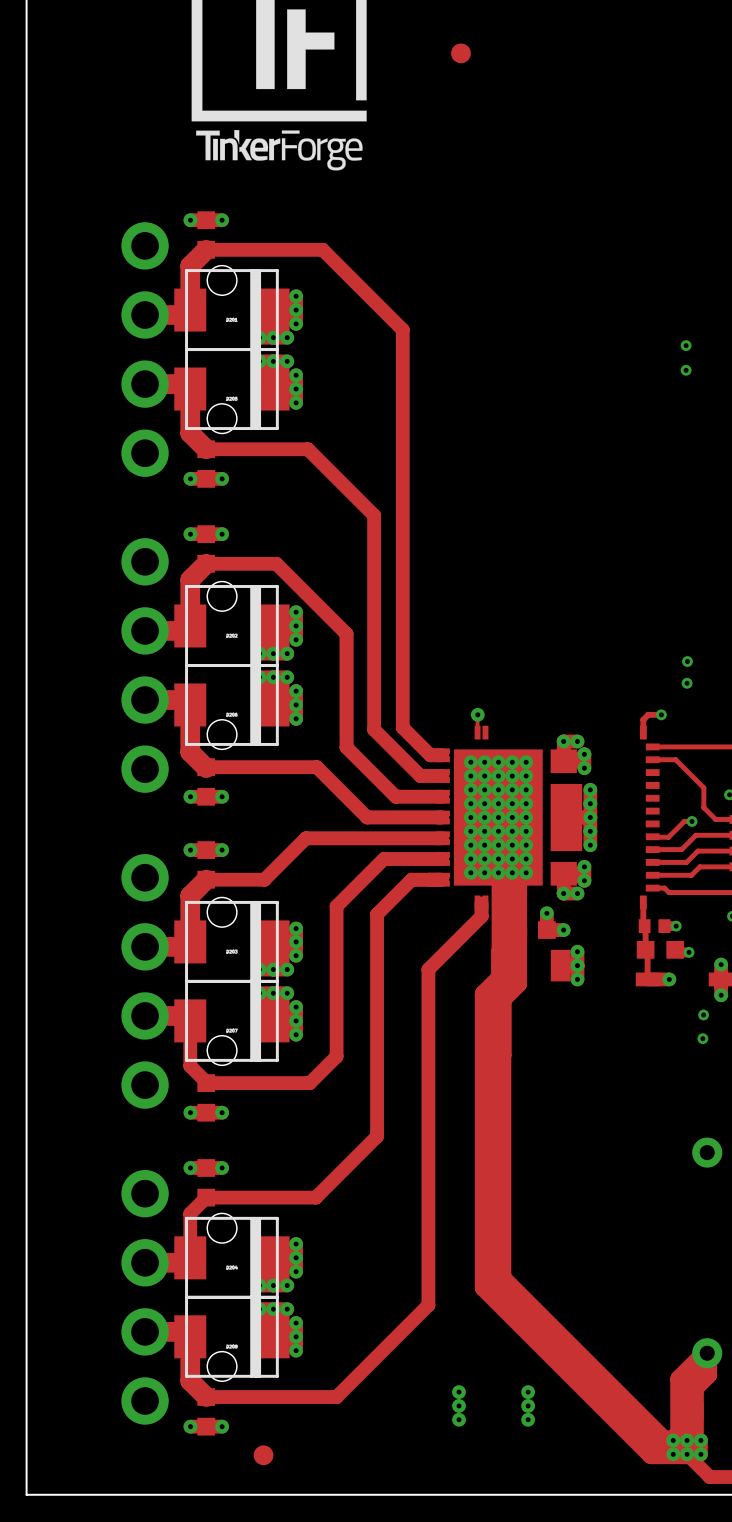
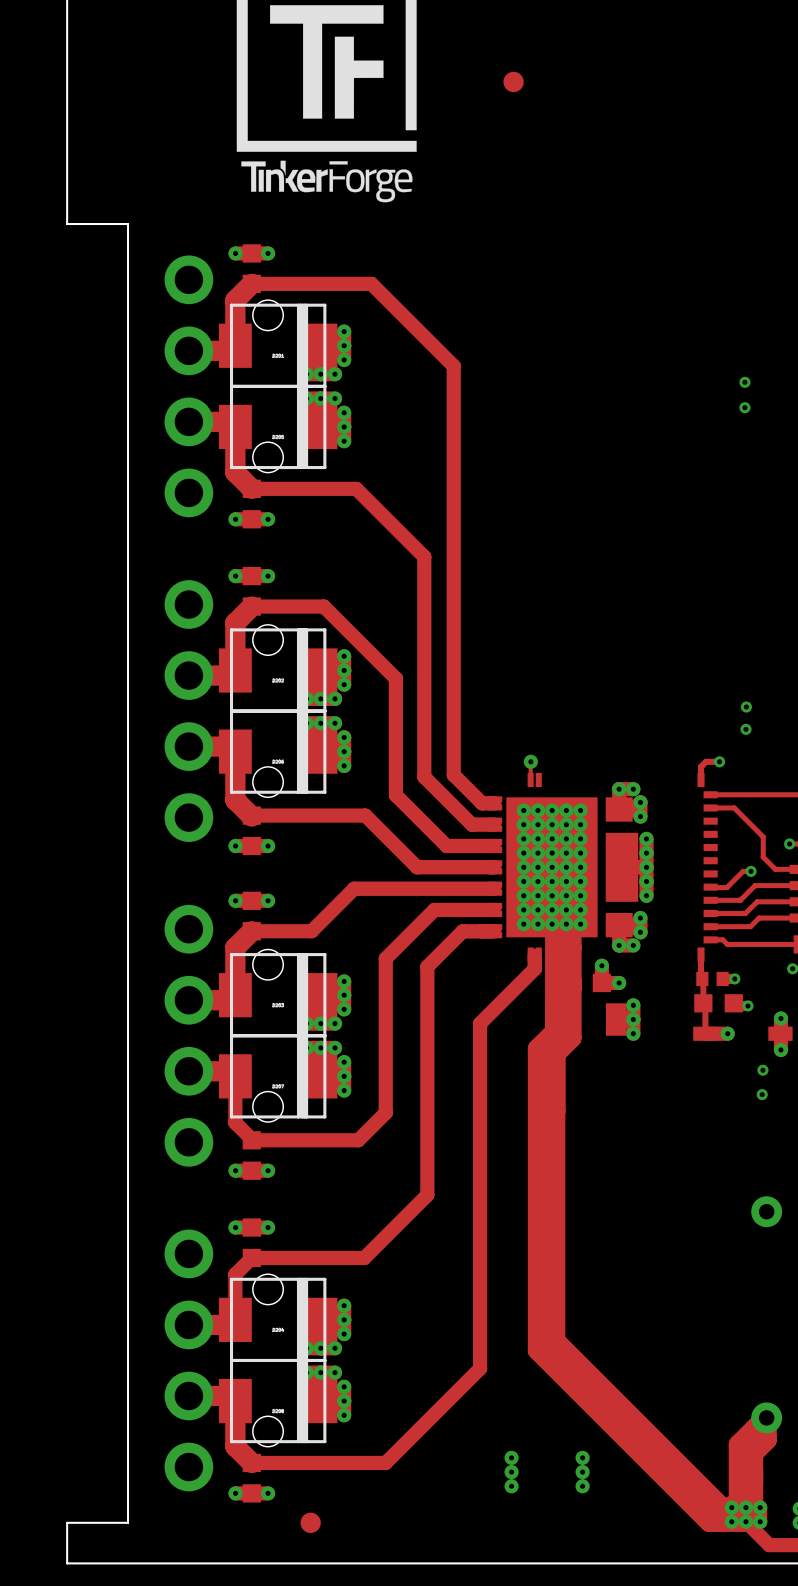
board edge: (26, 191) (26, 1455) -> (67, 224) (128, 224) (128, 1522) (67, 1522)

